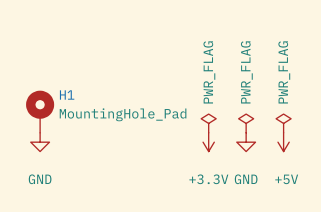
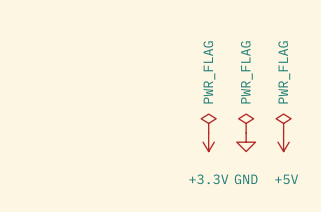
H1: MountingHole_Pad (40, 111) -> none
power symbol: GND (40, 142) -> none

